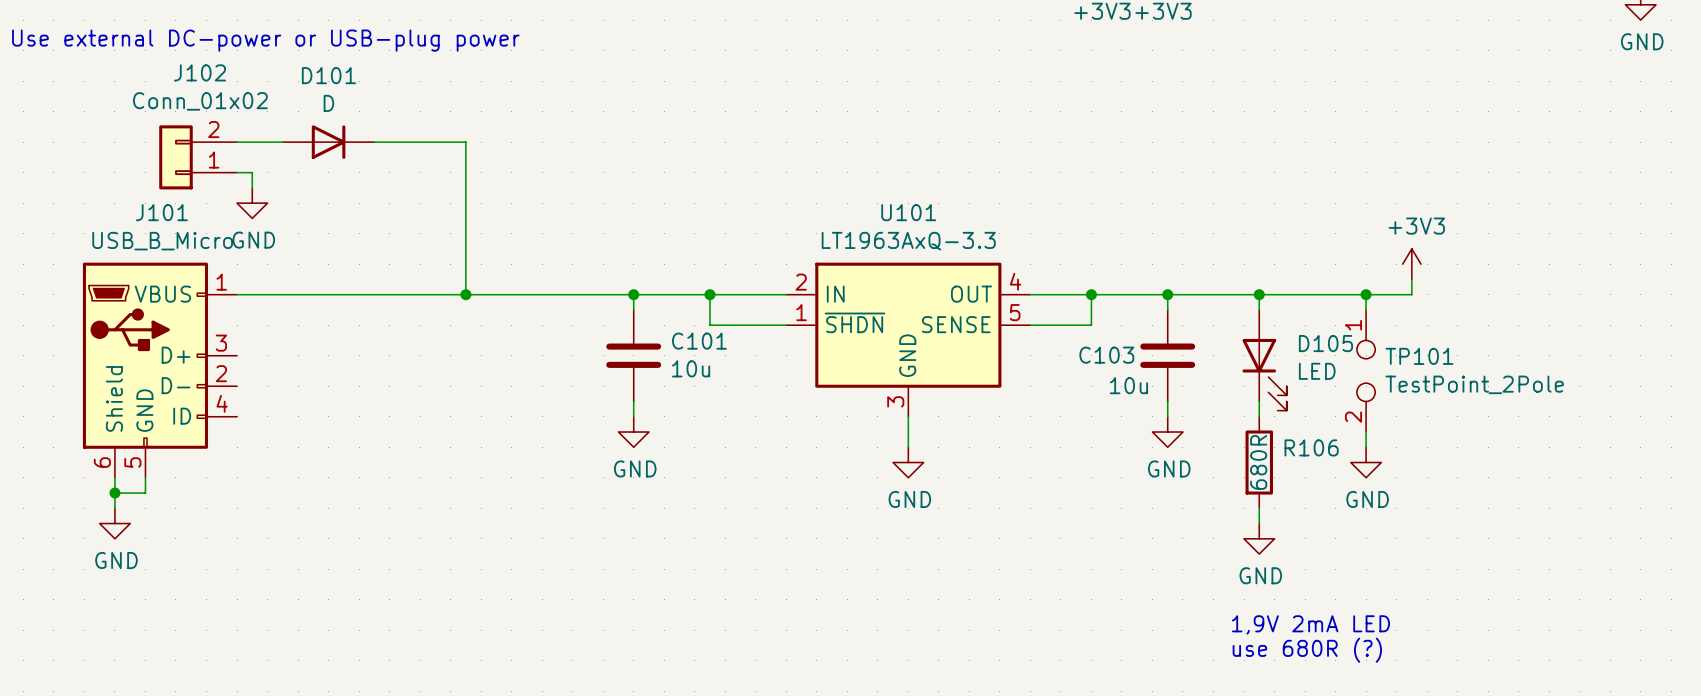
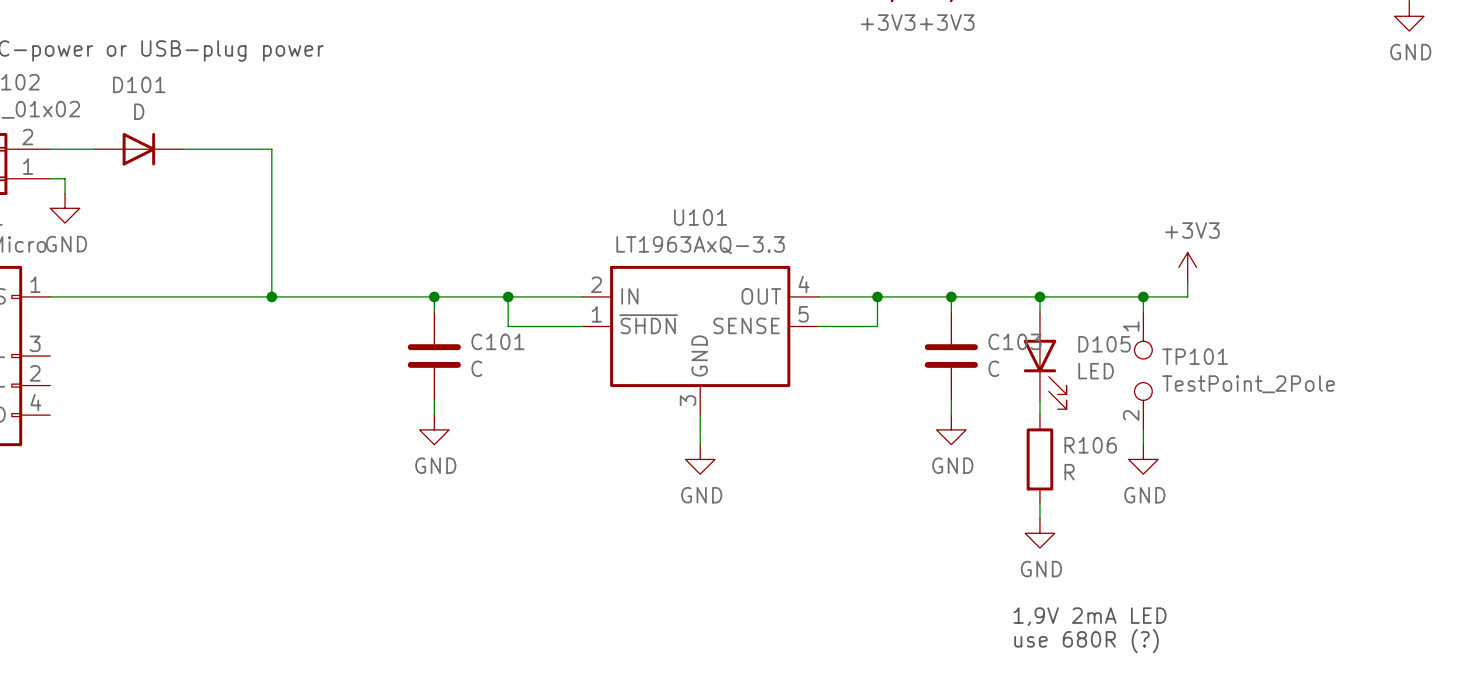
C103 name position: C103 (1106, 355) -> C103 (1014, 341)
C101 value: 10u (691, 368) -> C (476, 368)
C103 value: 10u (1128, 385) -> C (993, 368)
R106 value: 680R (1258, 462) -> R (1069, 472)

